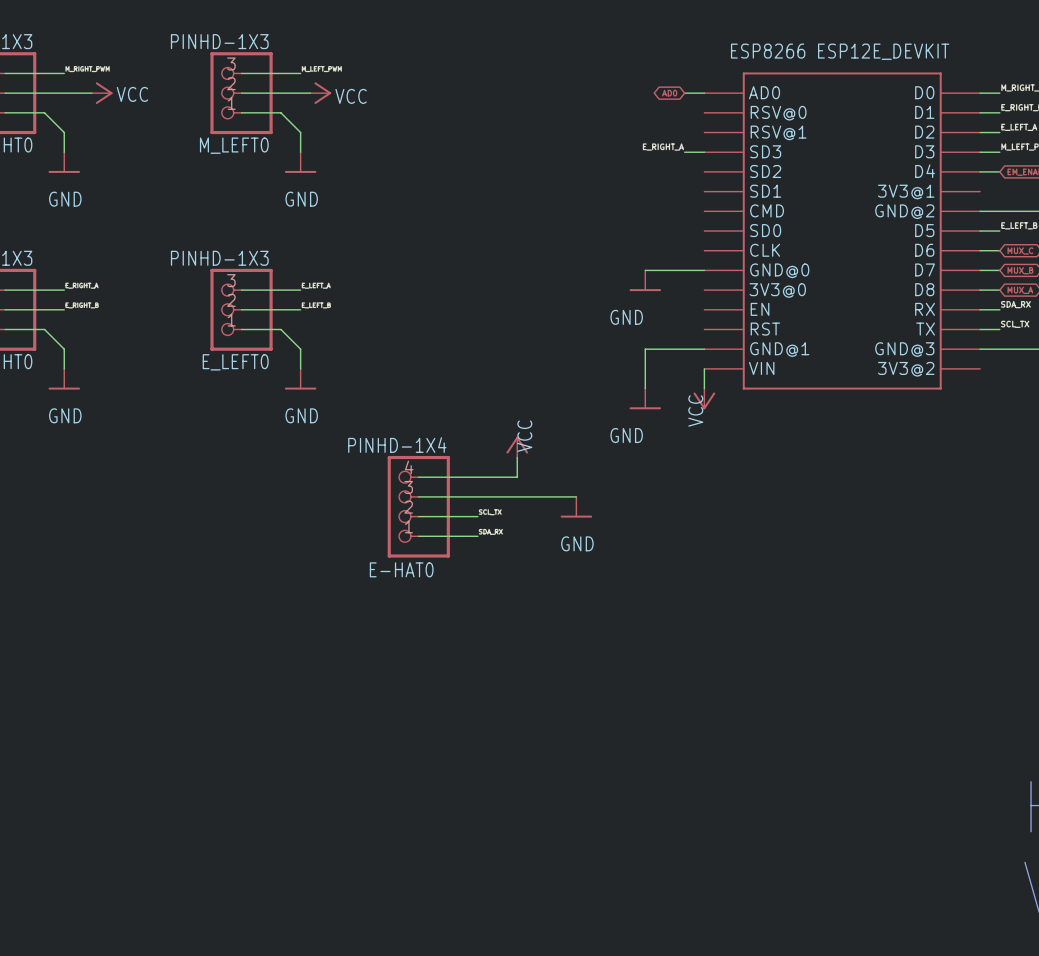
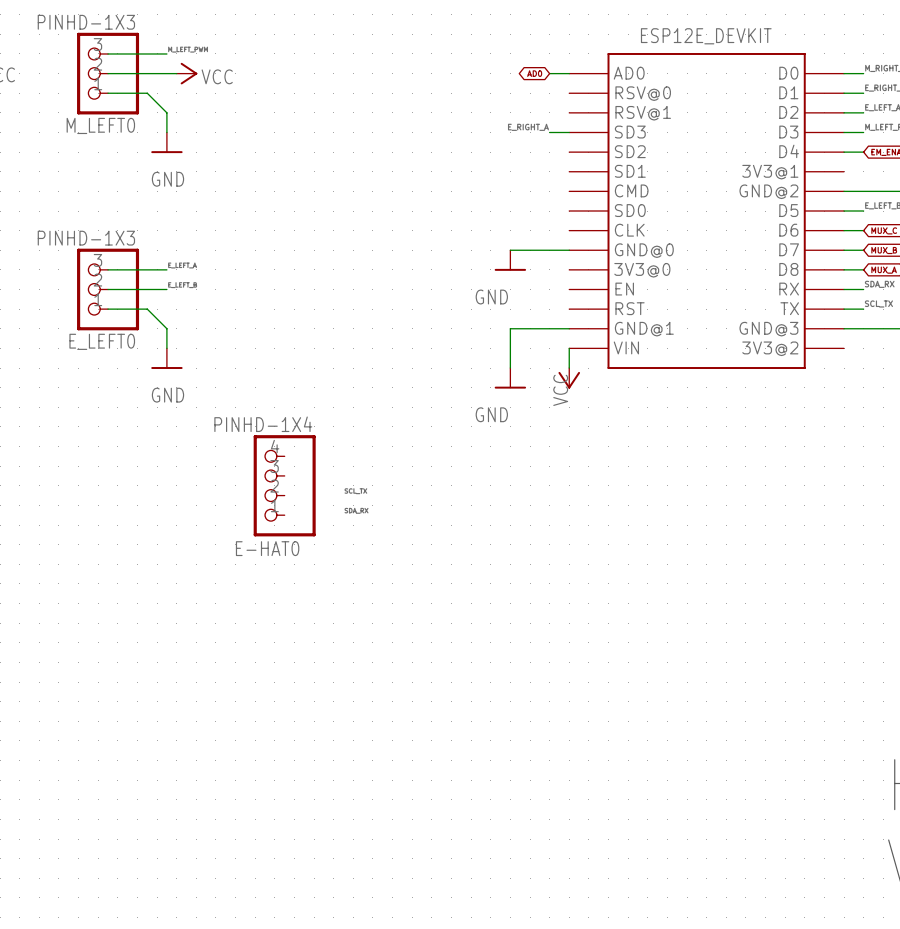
part value: ESP8266 ESP12E_DEVKIT (840, 51) -> ESP12E_DEVKIT (706, 36)
power symbol: VCC (517, 447) -> none
wire: (517, 457) (517, 477) (418, 477) -> none
wire: (418, 496) (576, 496) -> none
power symbol: GND (576, 507) -> none
wire: (418, 516) (477, 516) -> none
wire: (418, 536) (477, 536) -> none

